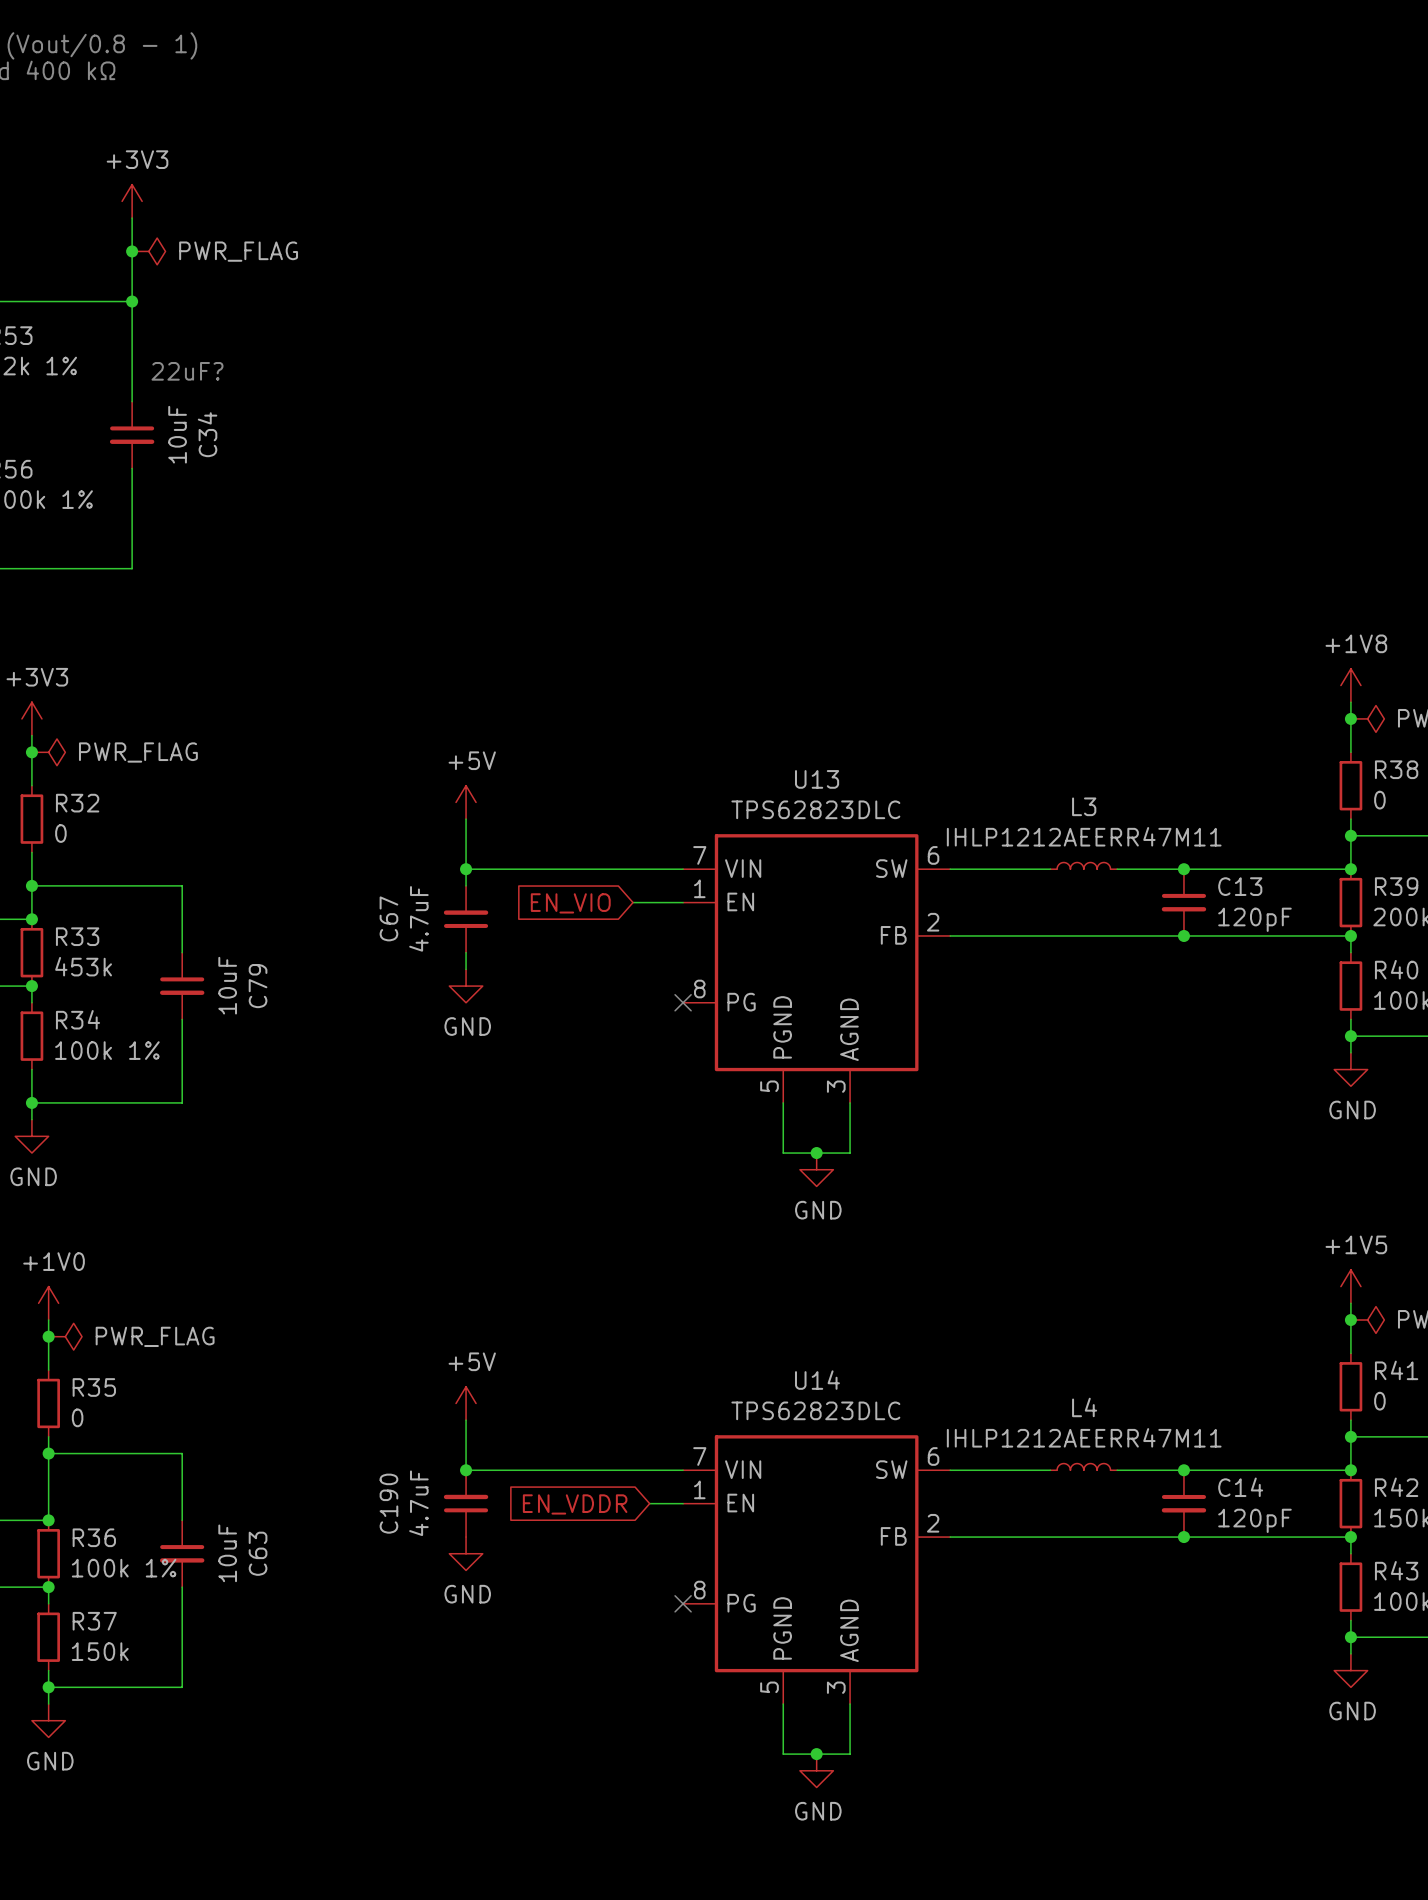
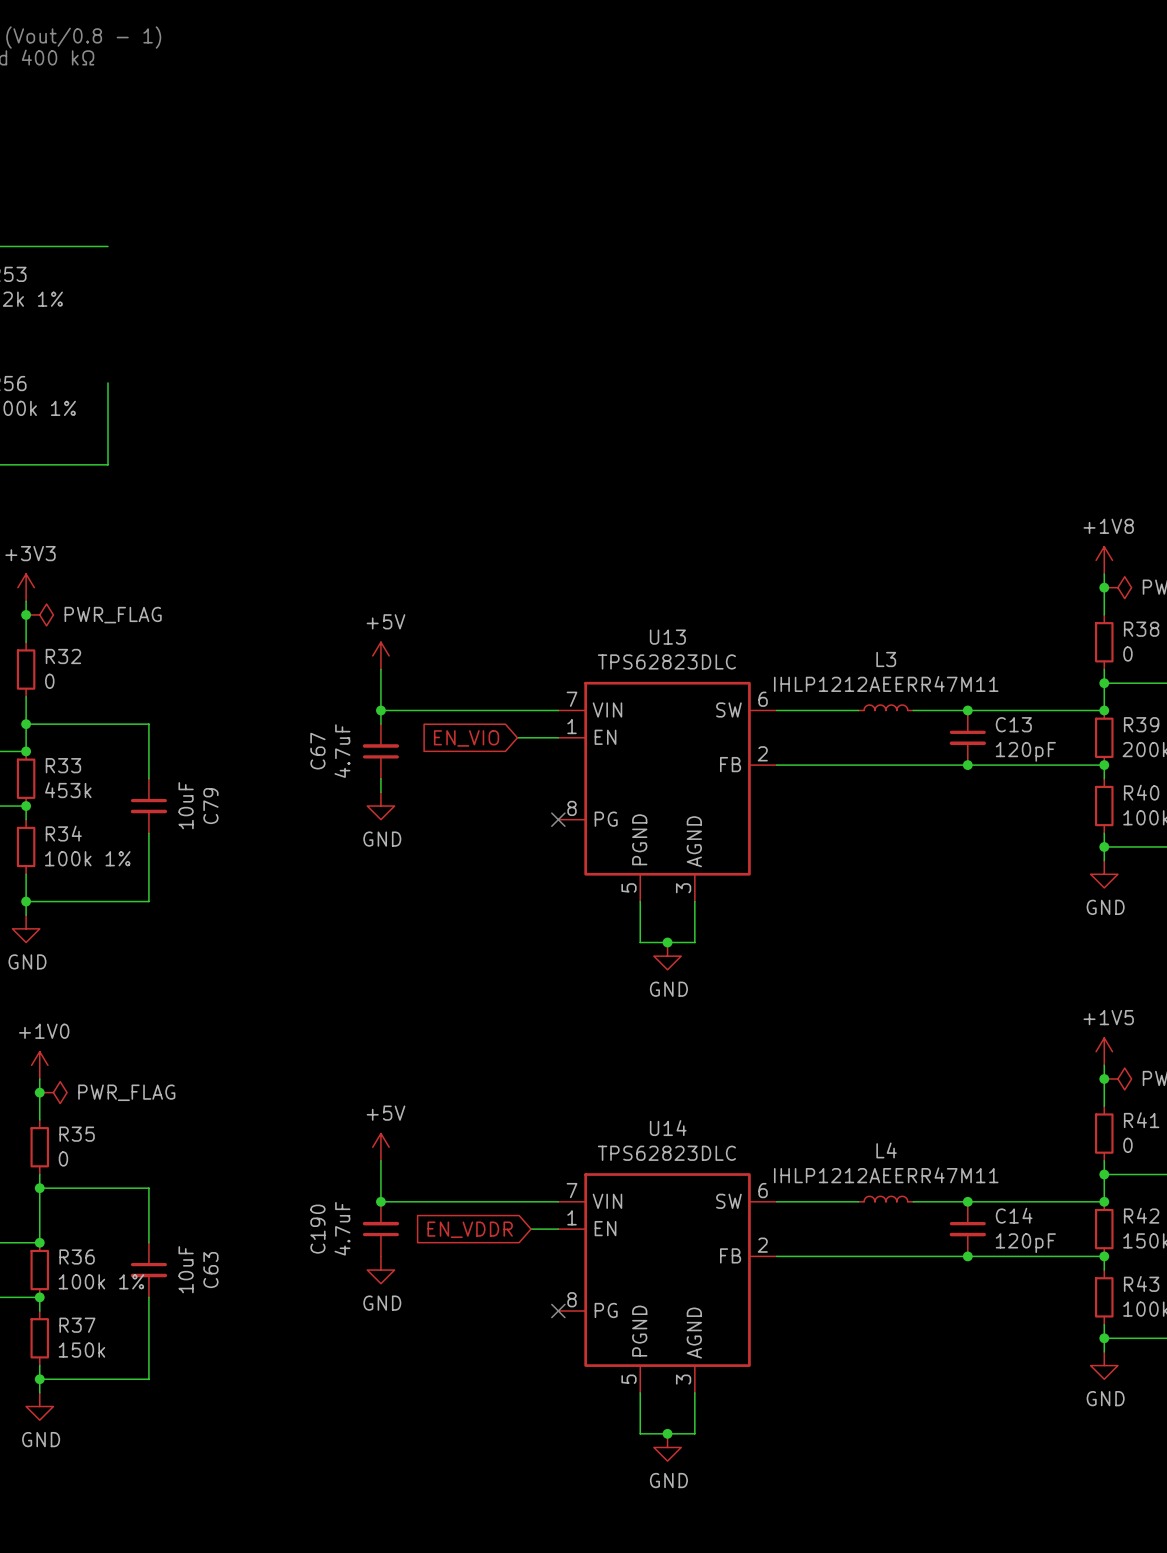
power symbol: +3V3 (132, 201) -> none
wire: (132, 218) (132, 401) -> none
junction: (132, 251) -> none
power symbol: PWR_FLAG (148, 251) -> none
junction: (132, 301) -> none
text: 22uF? (187, 371) -> none
C34: 10uF (132, 435) -> none

